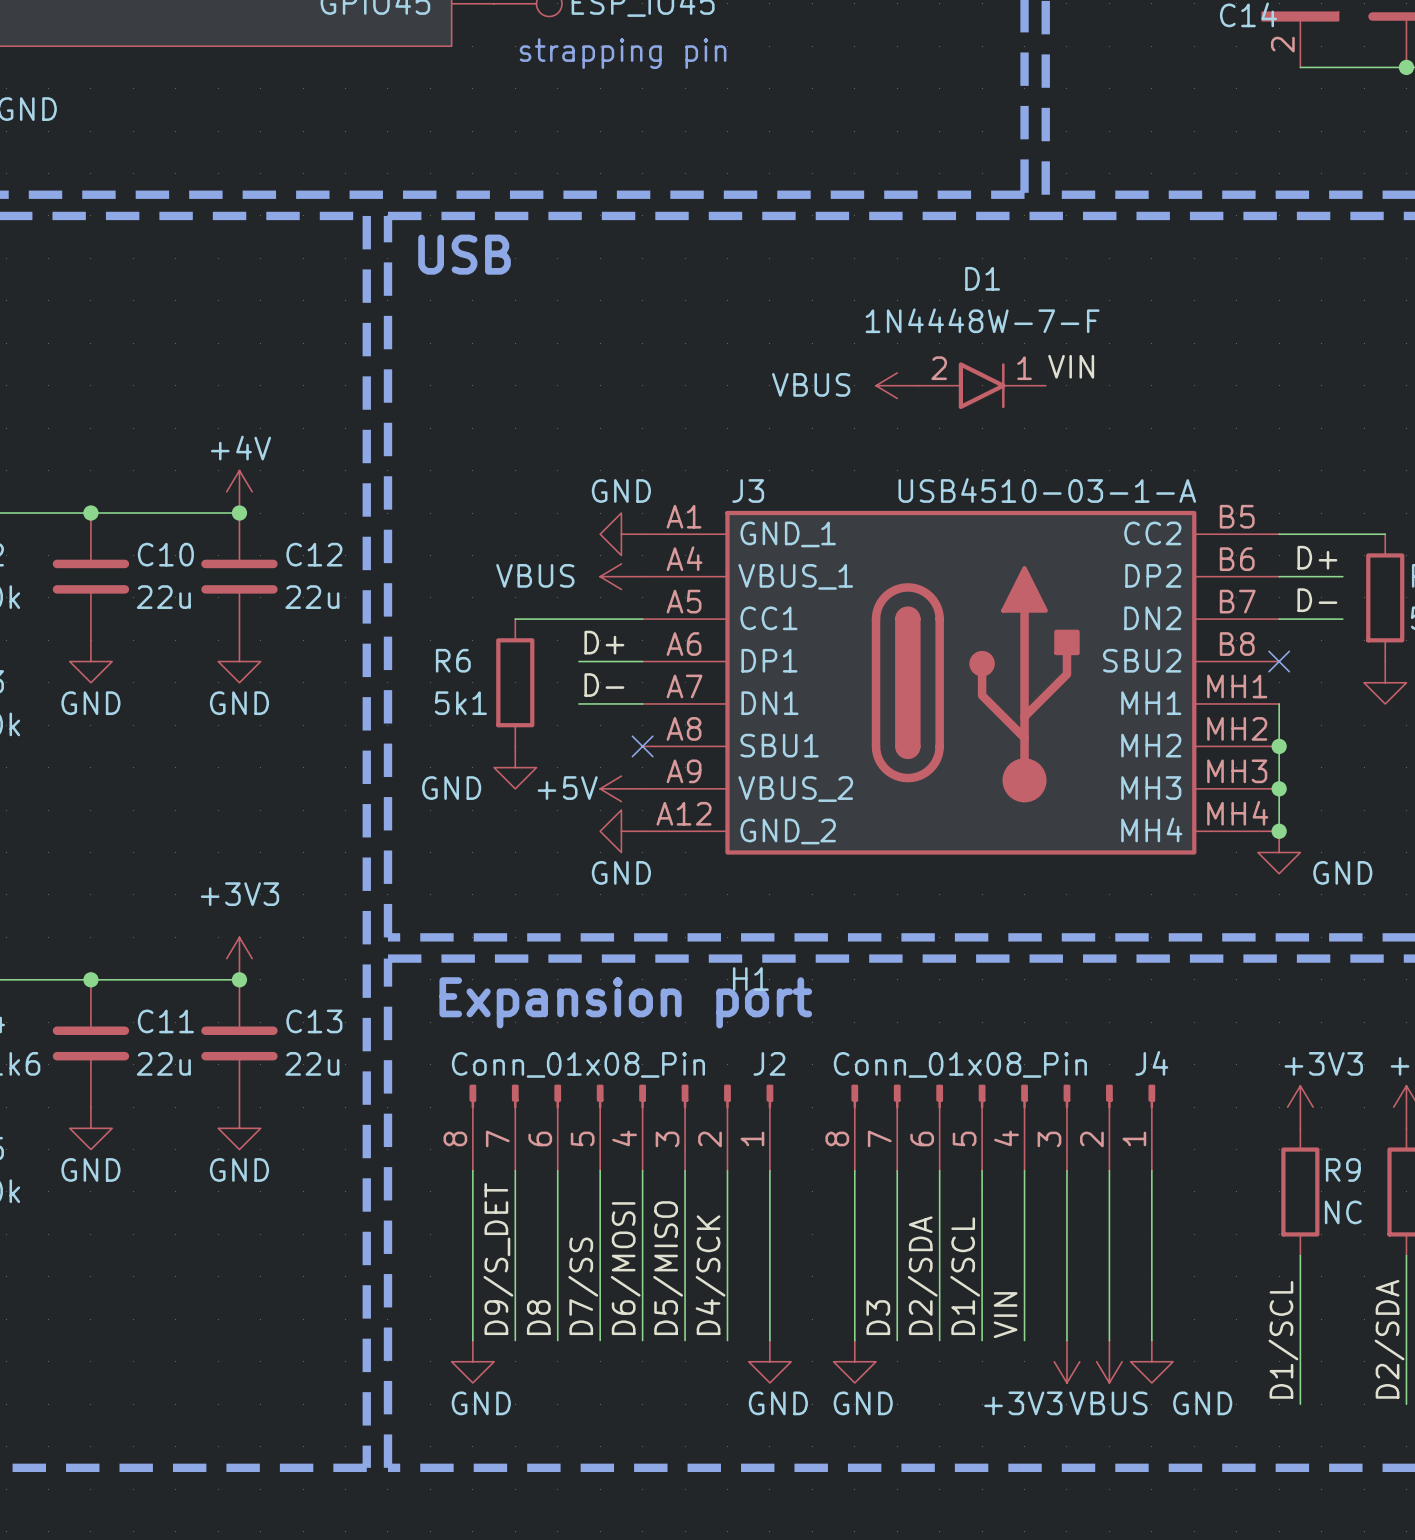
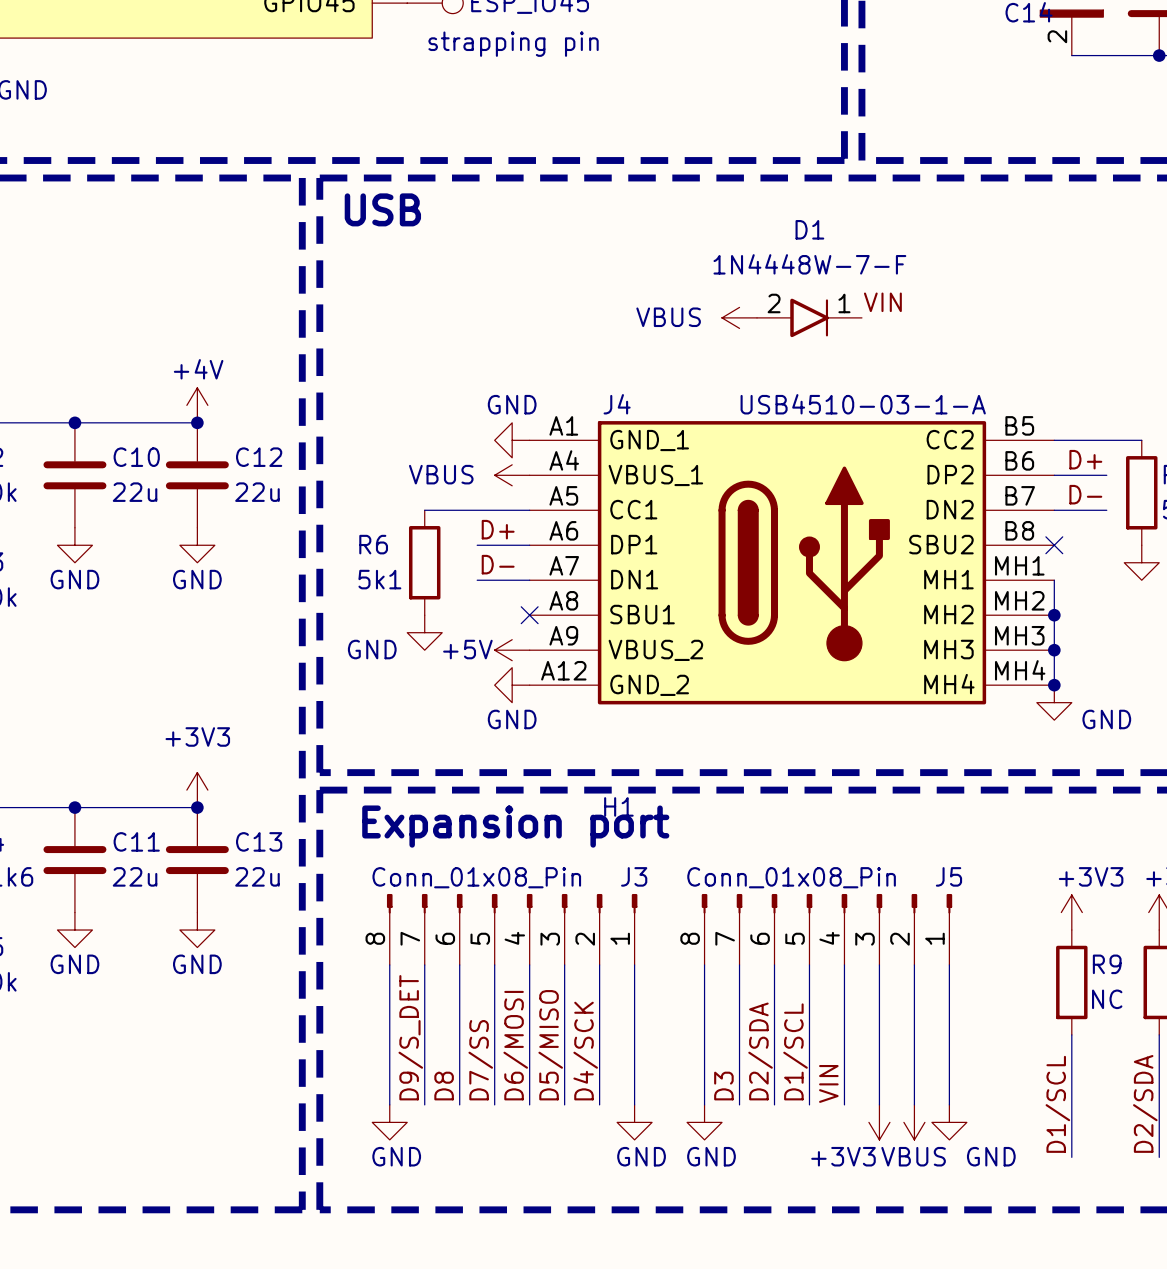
J3 name: J3 (748, 490) -> J4 (617, 404)
J2 name: J2 (769, 1063) -> J3 (634, 876)
J4 name: J4 (1151, 1063) -> J5 (948, 876)

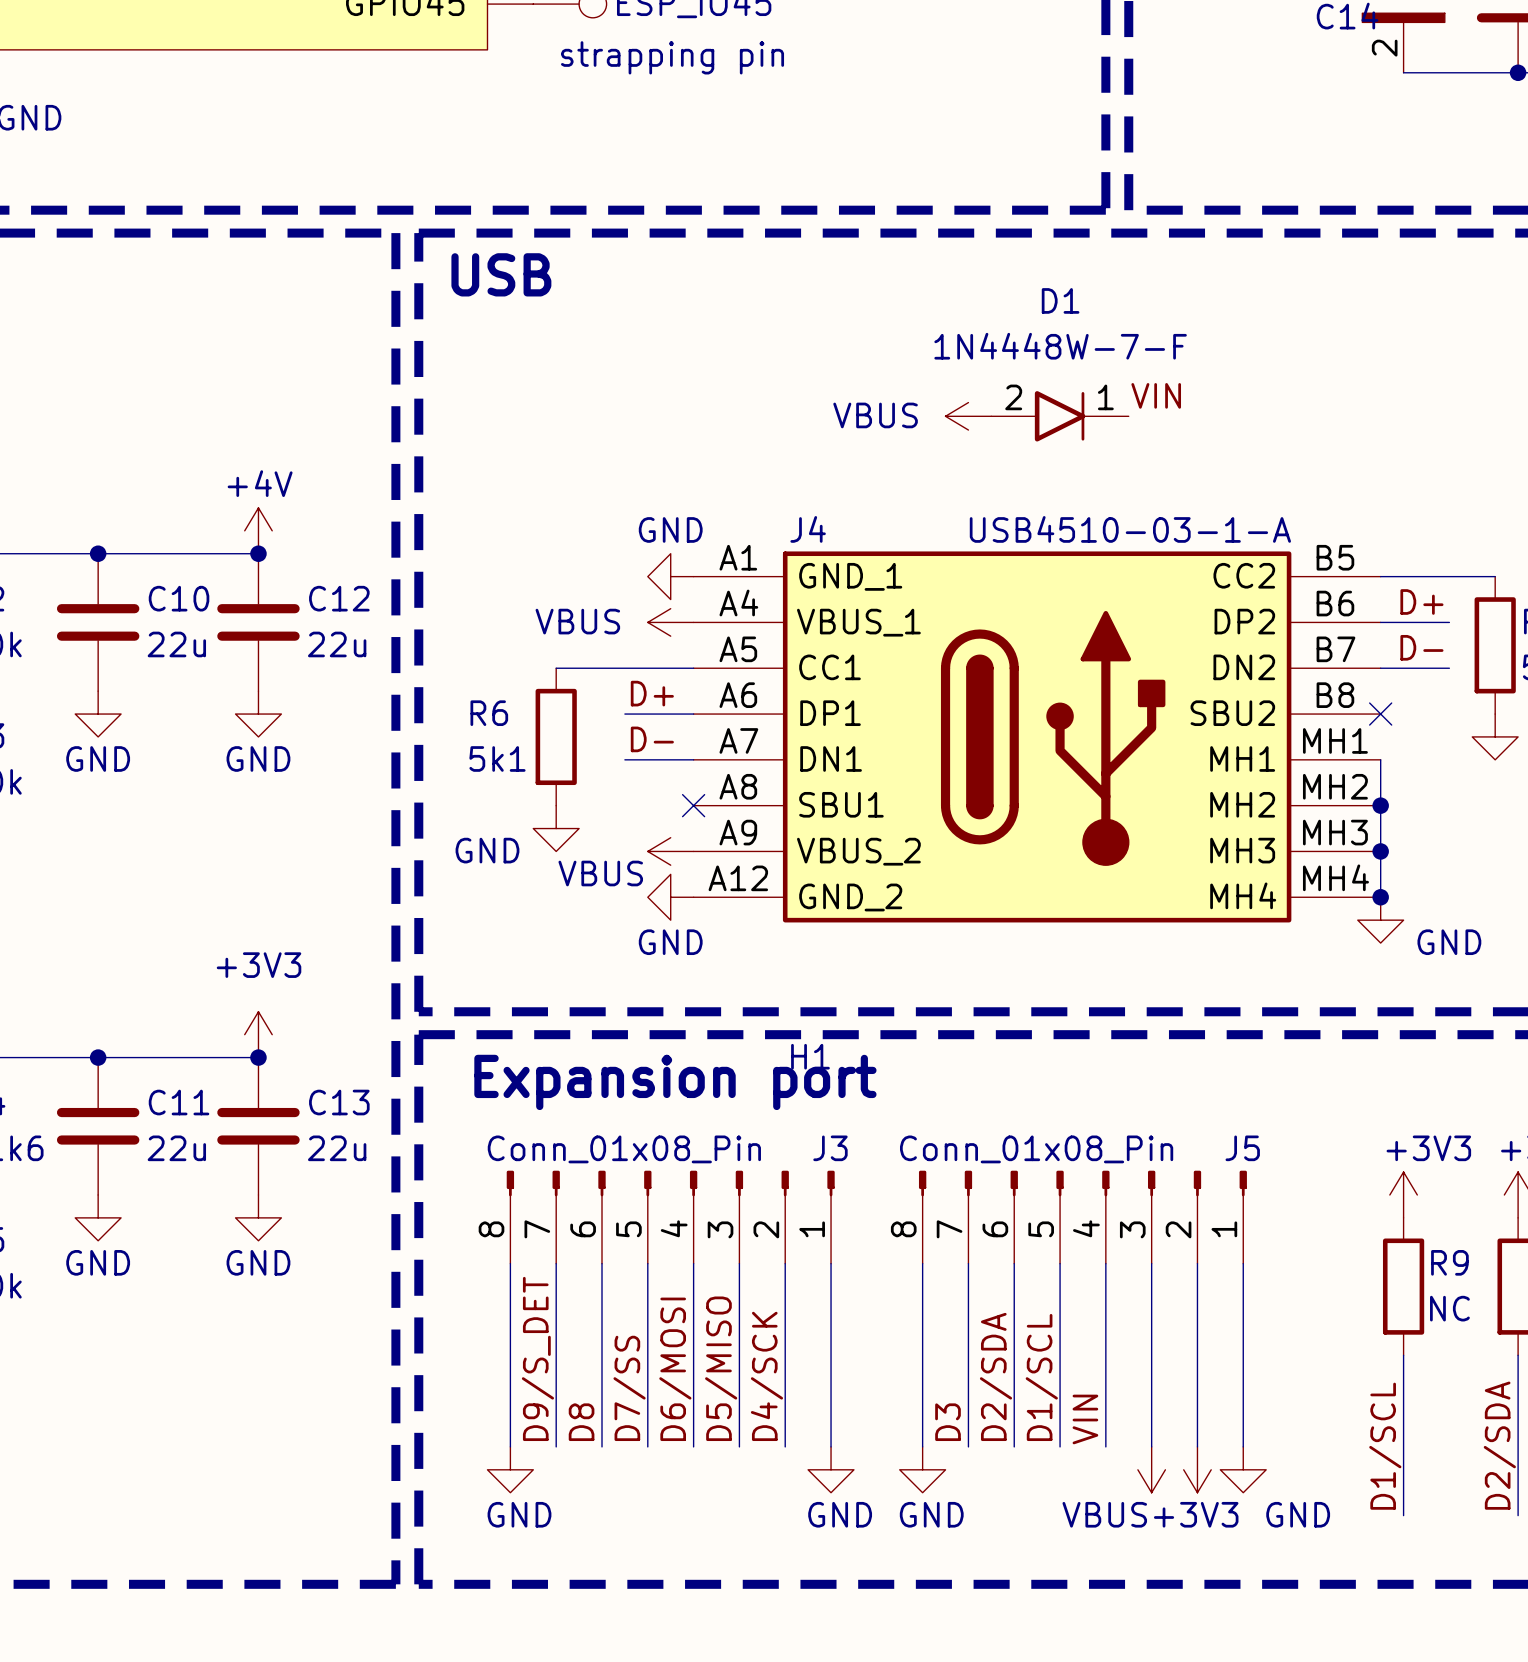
power symbol: +5V (512, 650) -> VBUS (670, 851)
power symbol: +3V3 (879, 1122) -> VBUS (1151, 1469)
power symbol: VBUS (914, 1122) -> +3V3 (1197, 1469)

